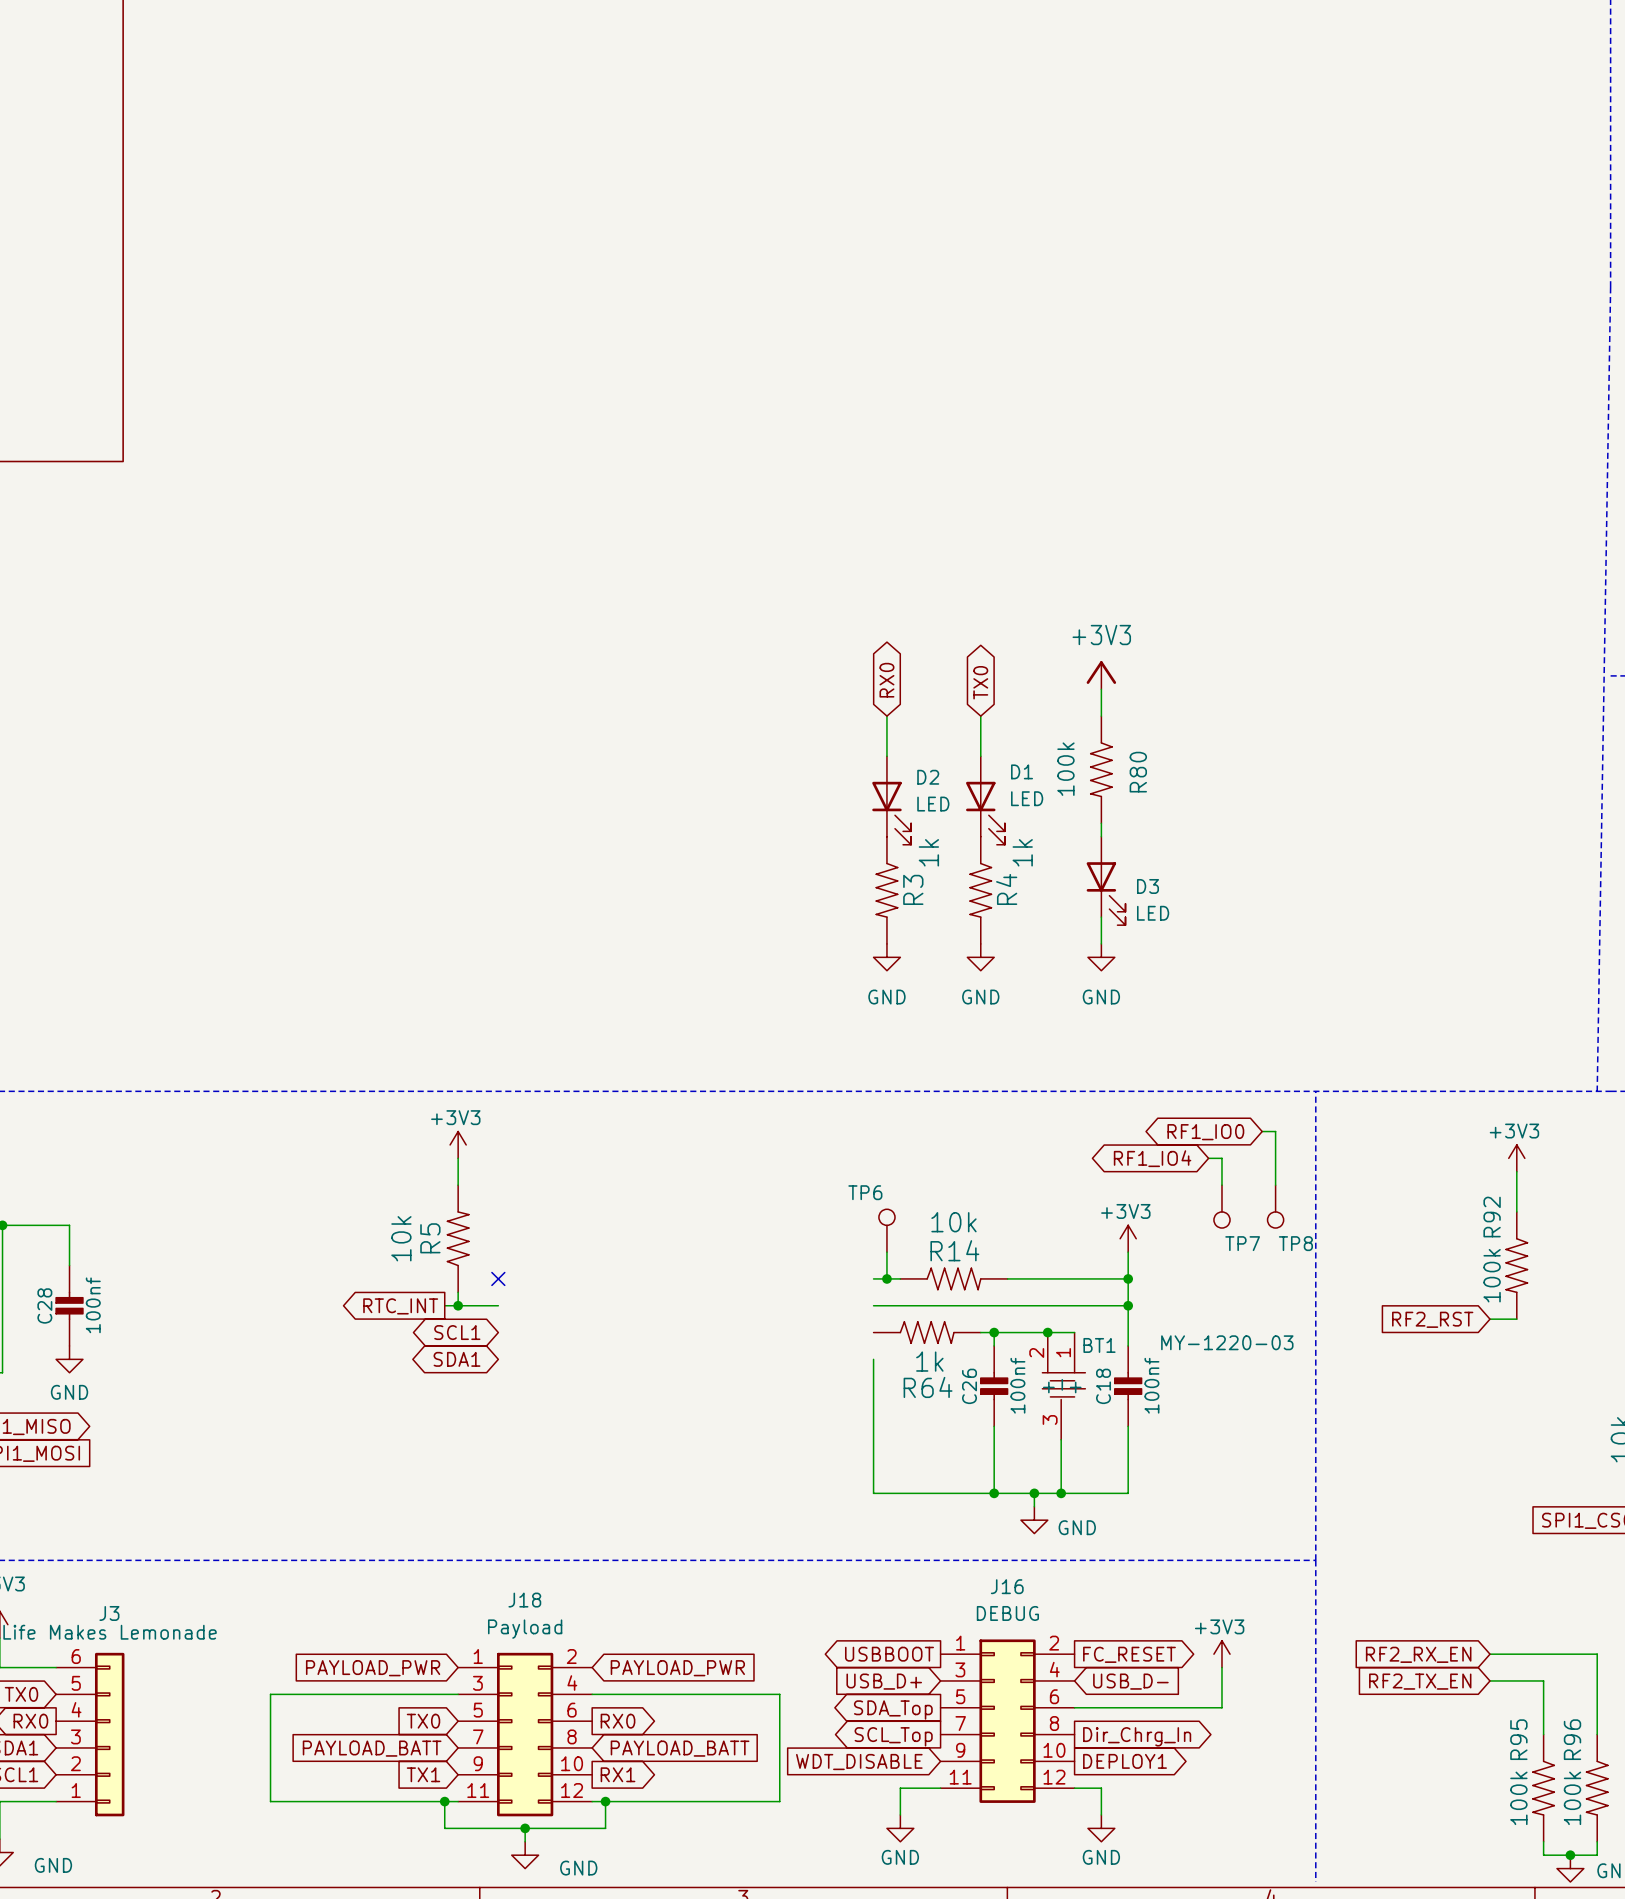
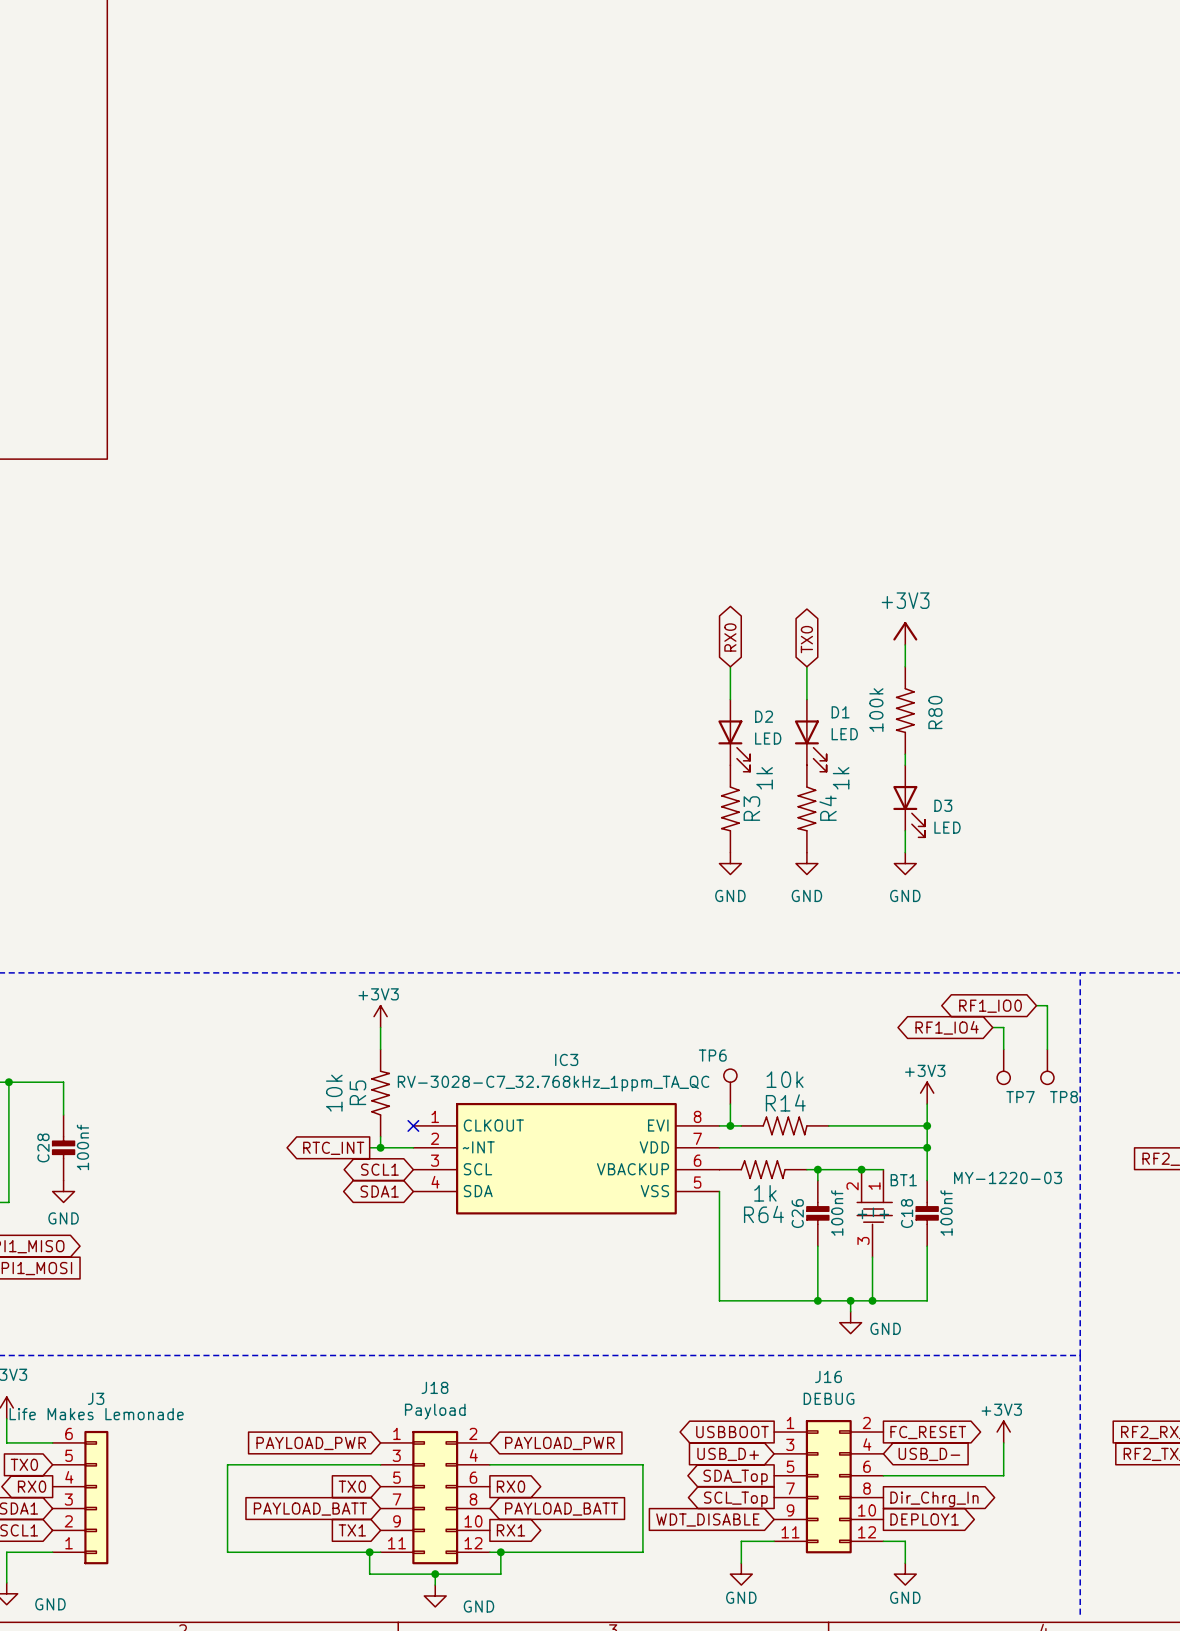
IC3: none -> RV-3028-C7_32.768kHz_1ppm_TA_QC (566, 1158)

